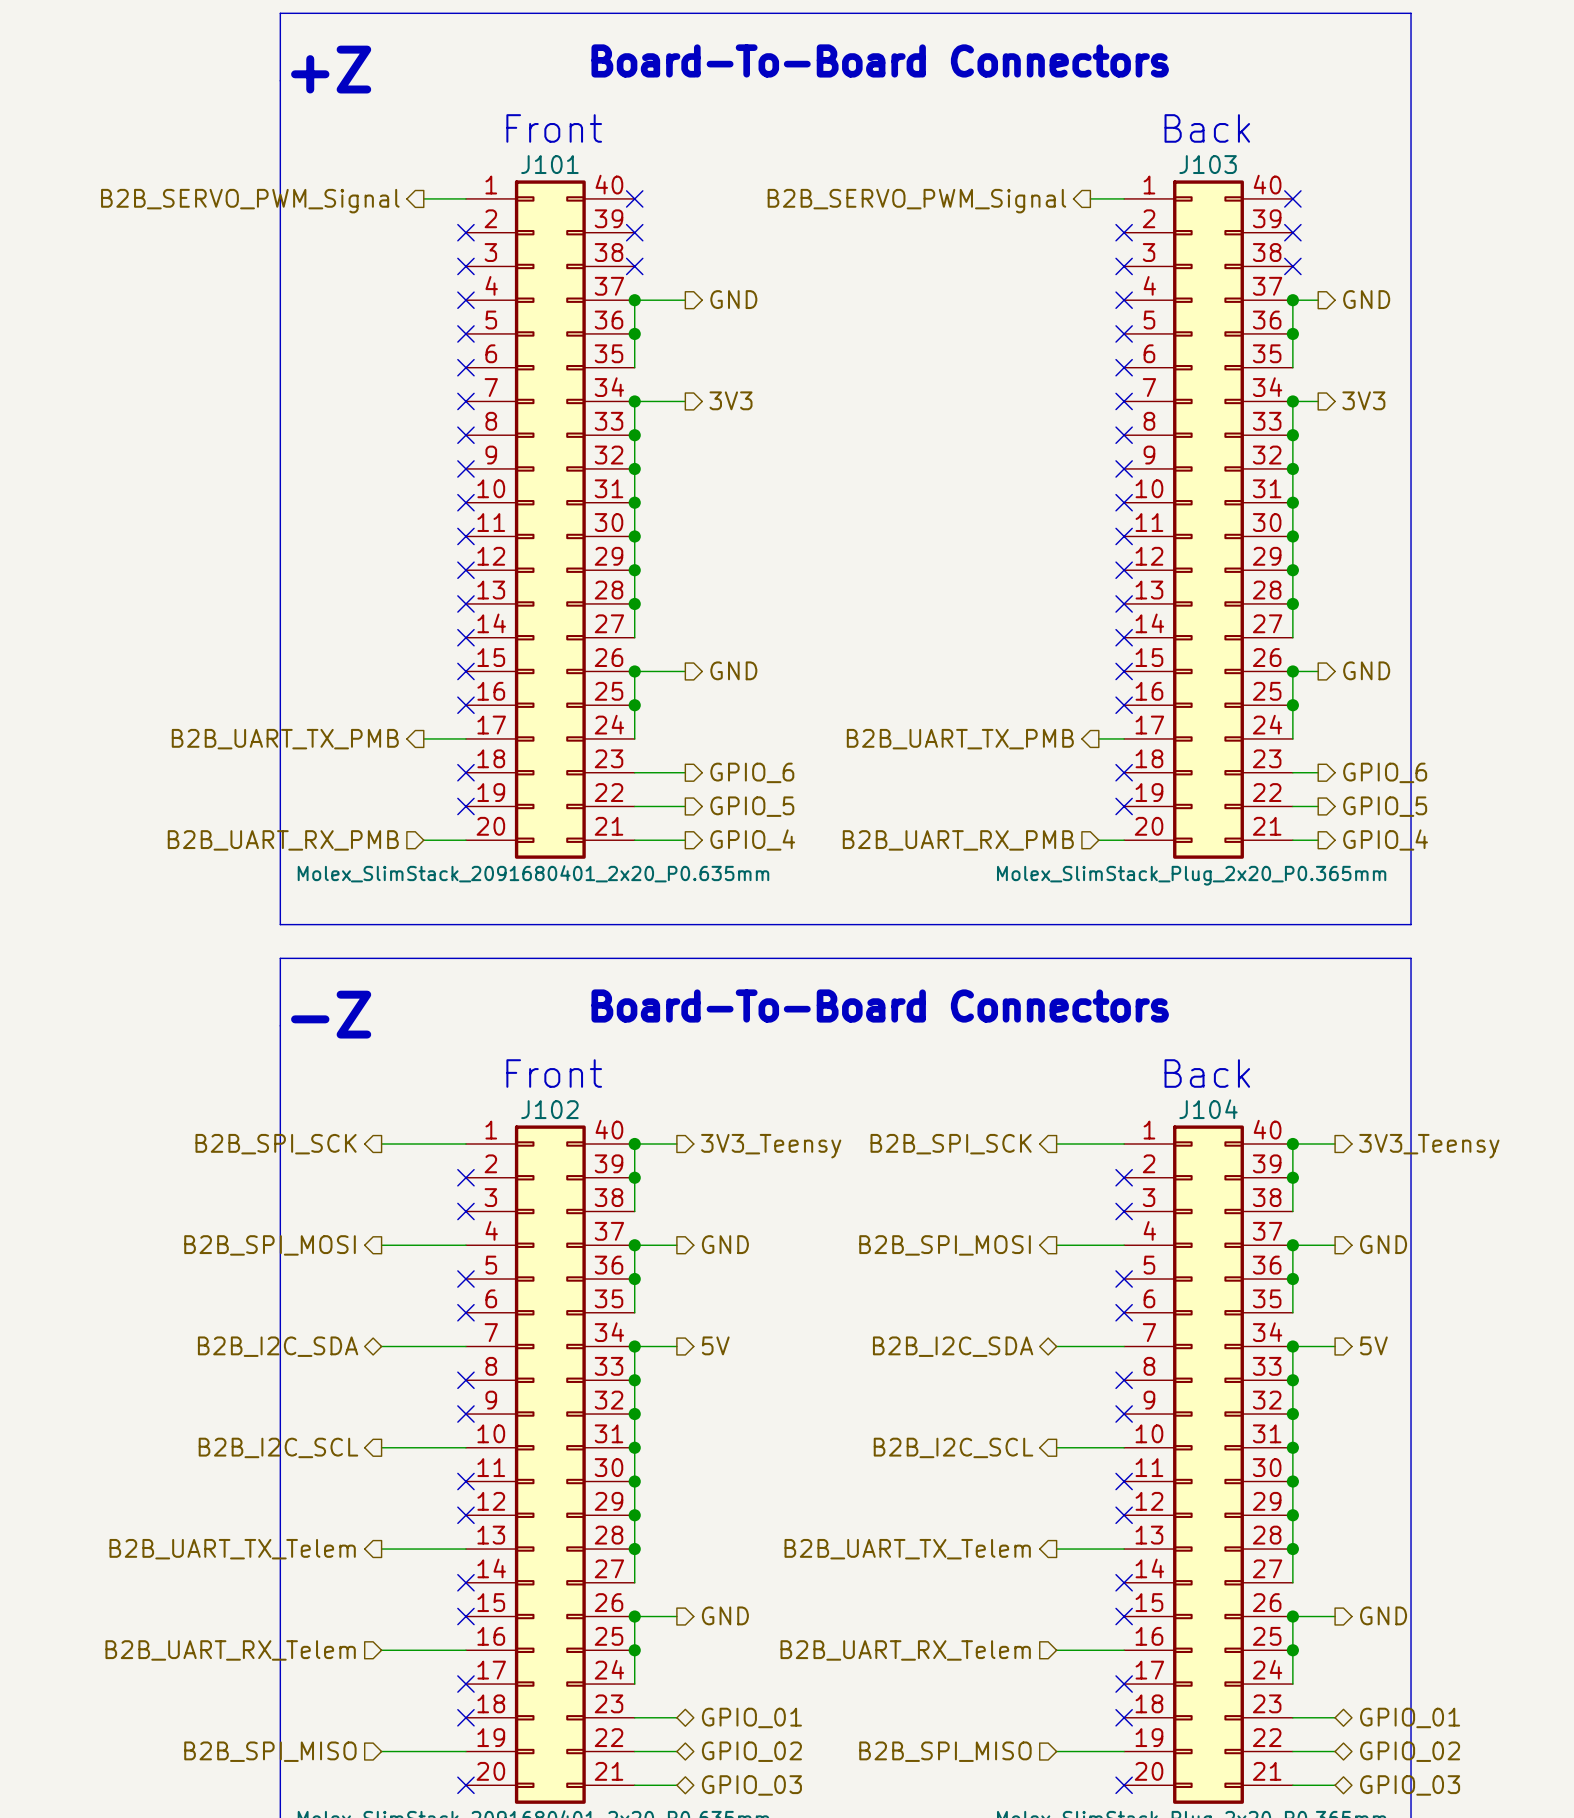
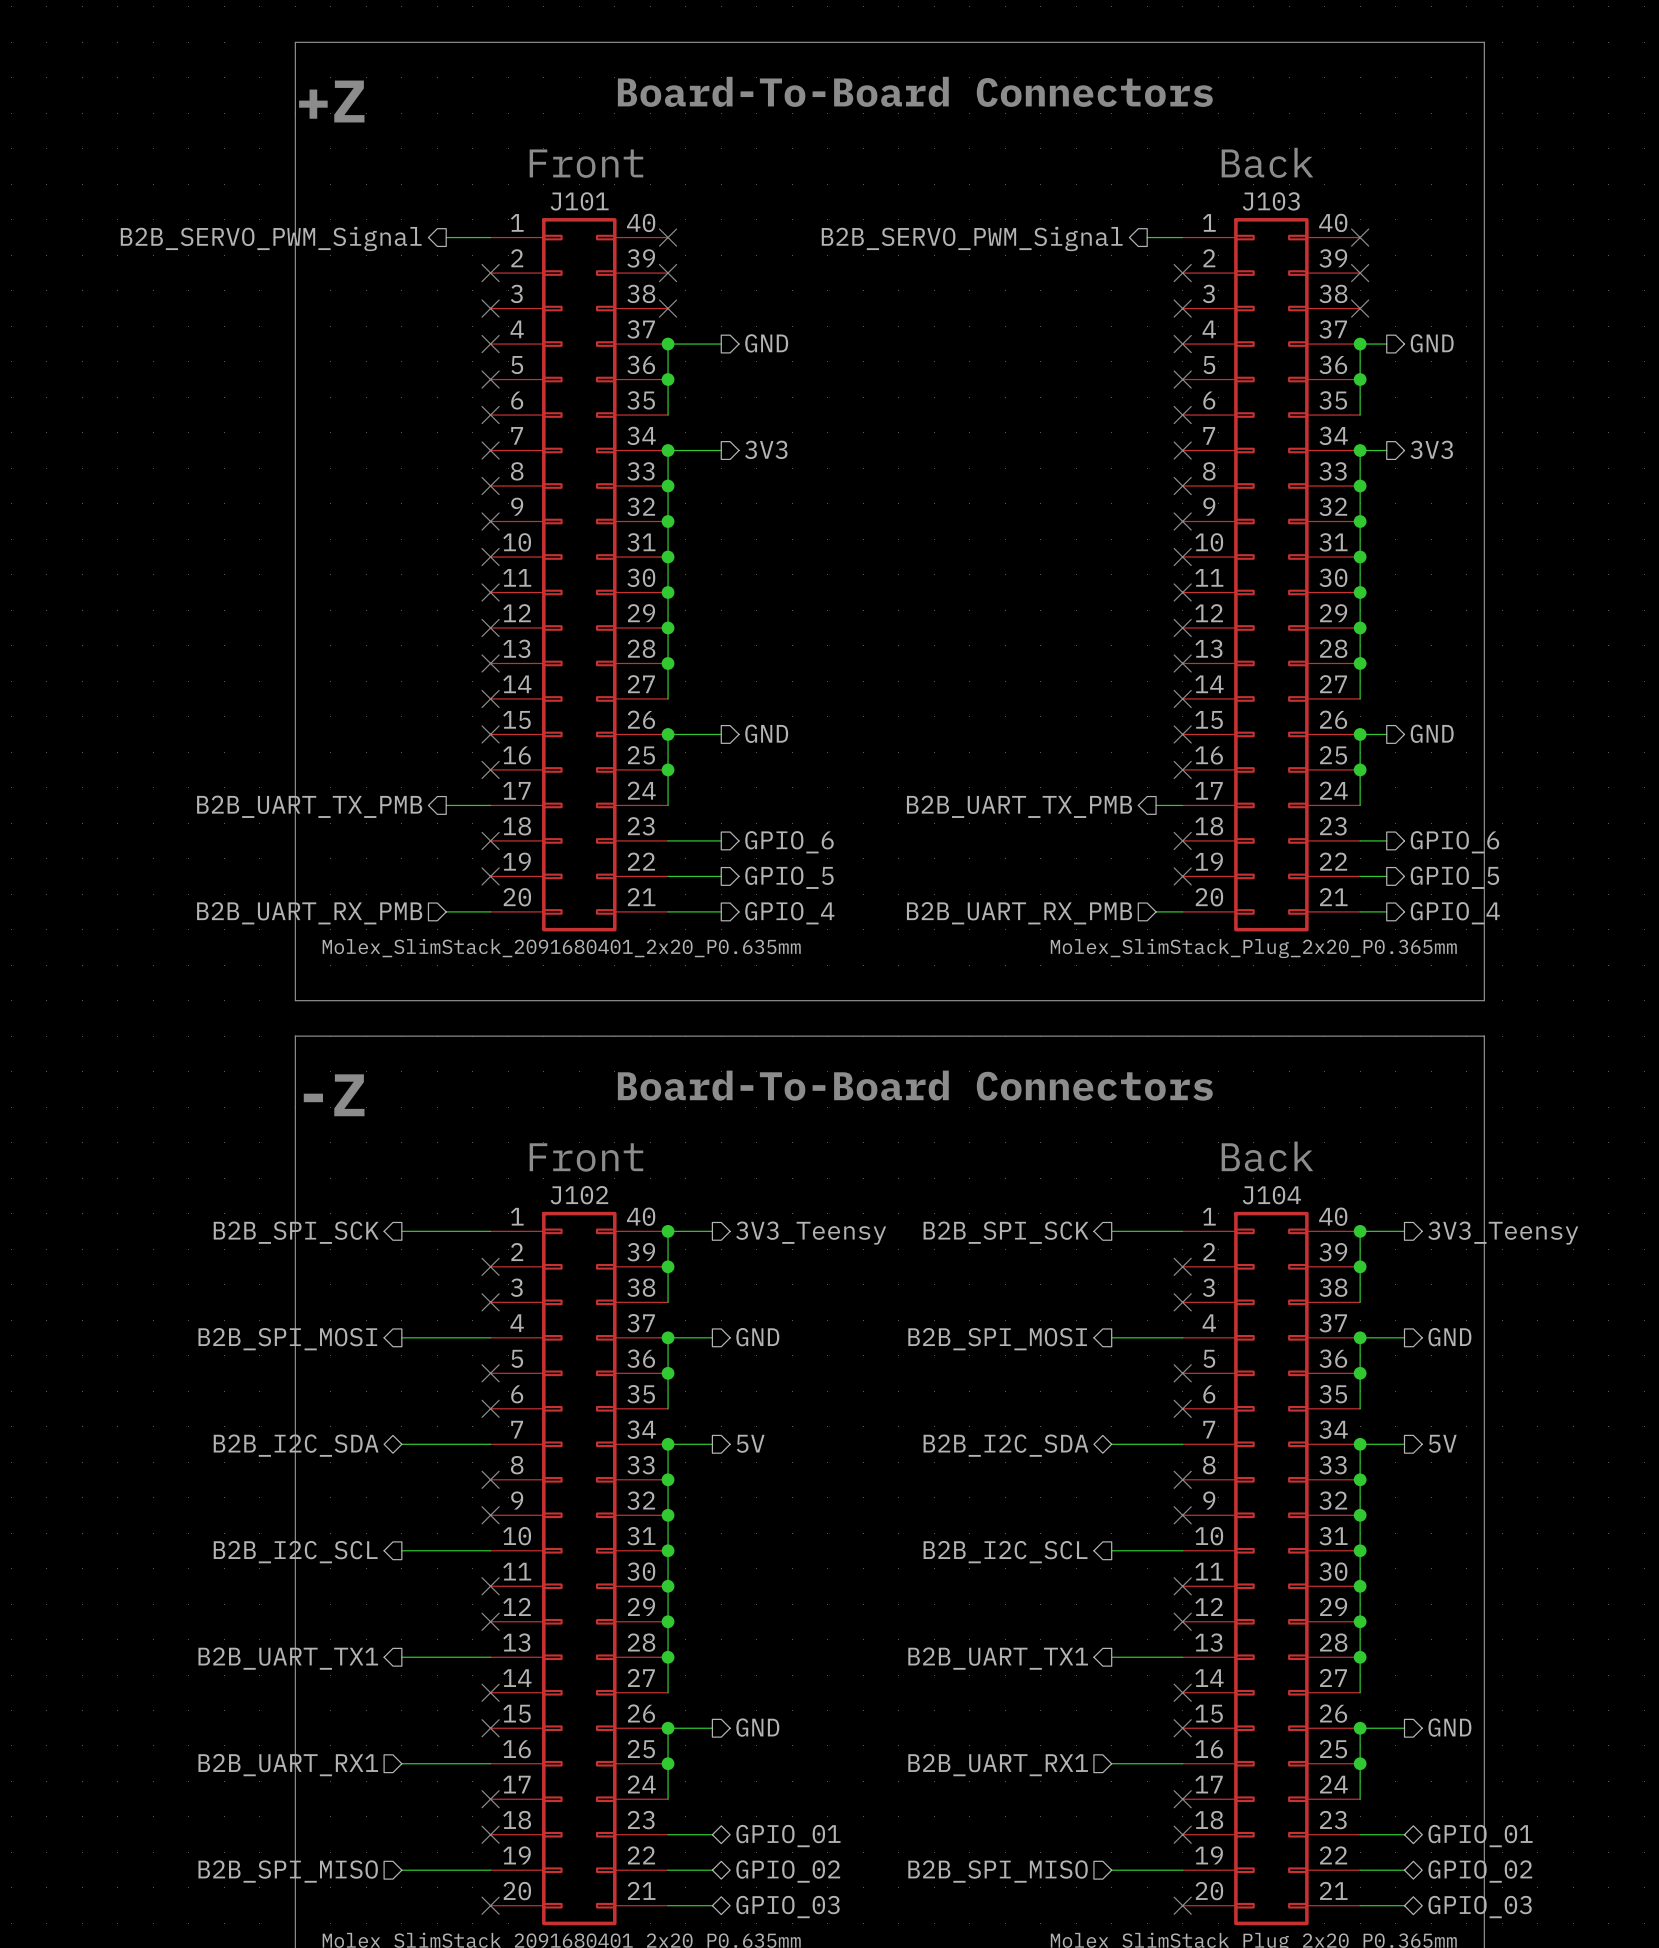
hierarchical label: B2B_UART_TX_Telem (232, 1549) -> B2B_UART_TX1 (288, 1658)
hierarchical label: B2B_UART_TX_Telem (907, 1549) -> B2B_UART_TX1 (998, 1658)
hierarchical label: B2B_UART_RX_Telem (230, 1650) -> B2B_UART_RX1 (288, 1765)
hierarchical label: B2B_UART_RX_Telem (905, 1650) -> B2B_UART_RX1 (998, 1765)

